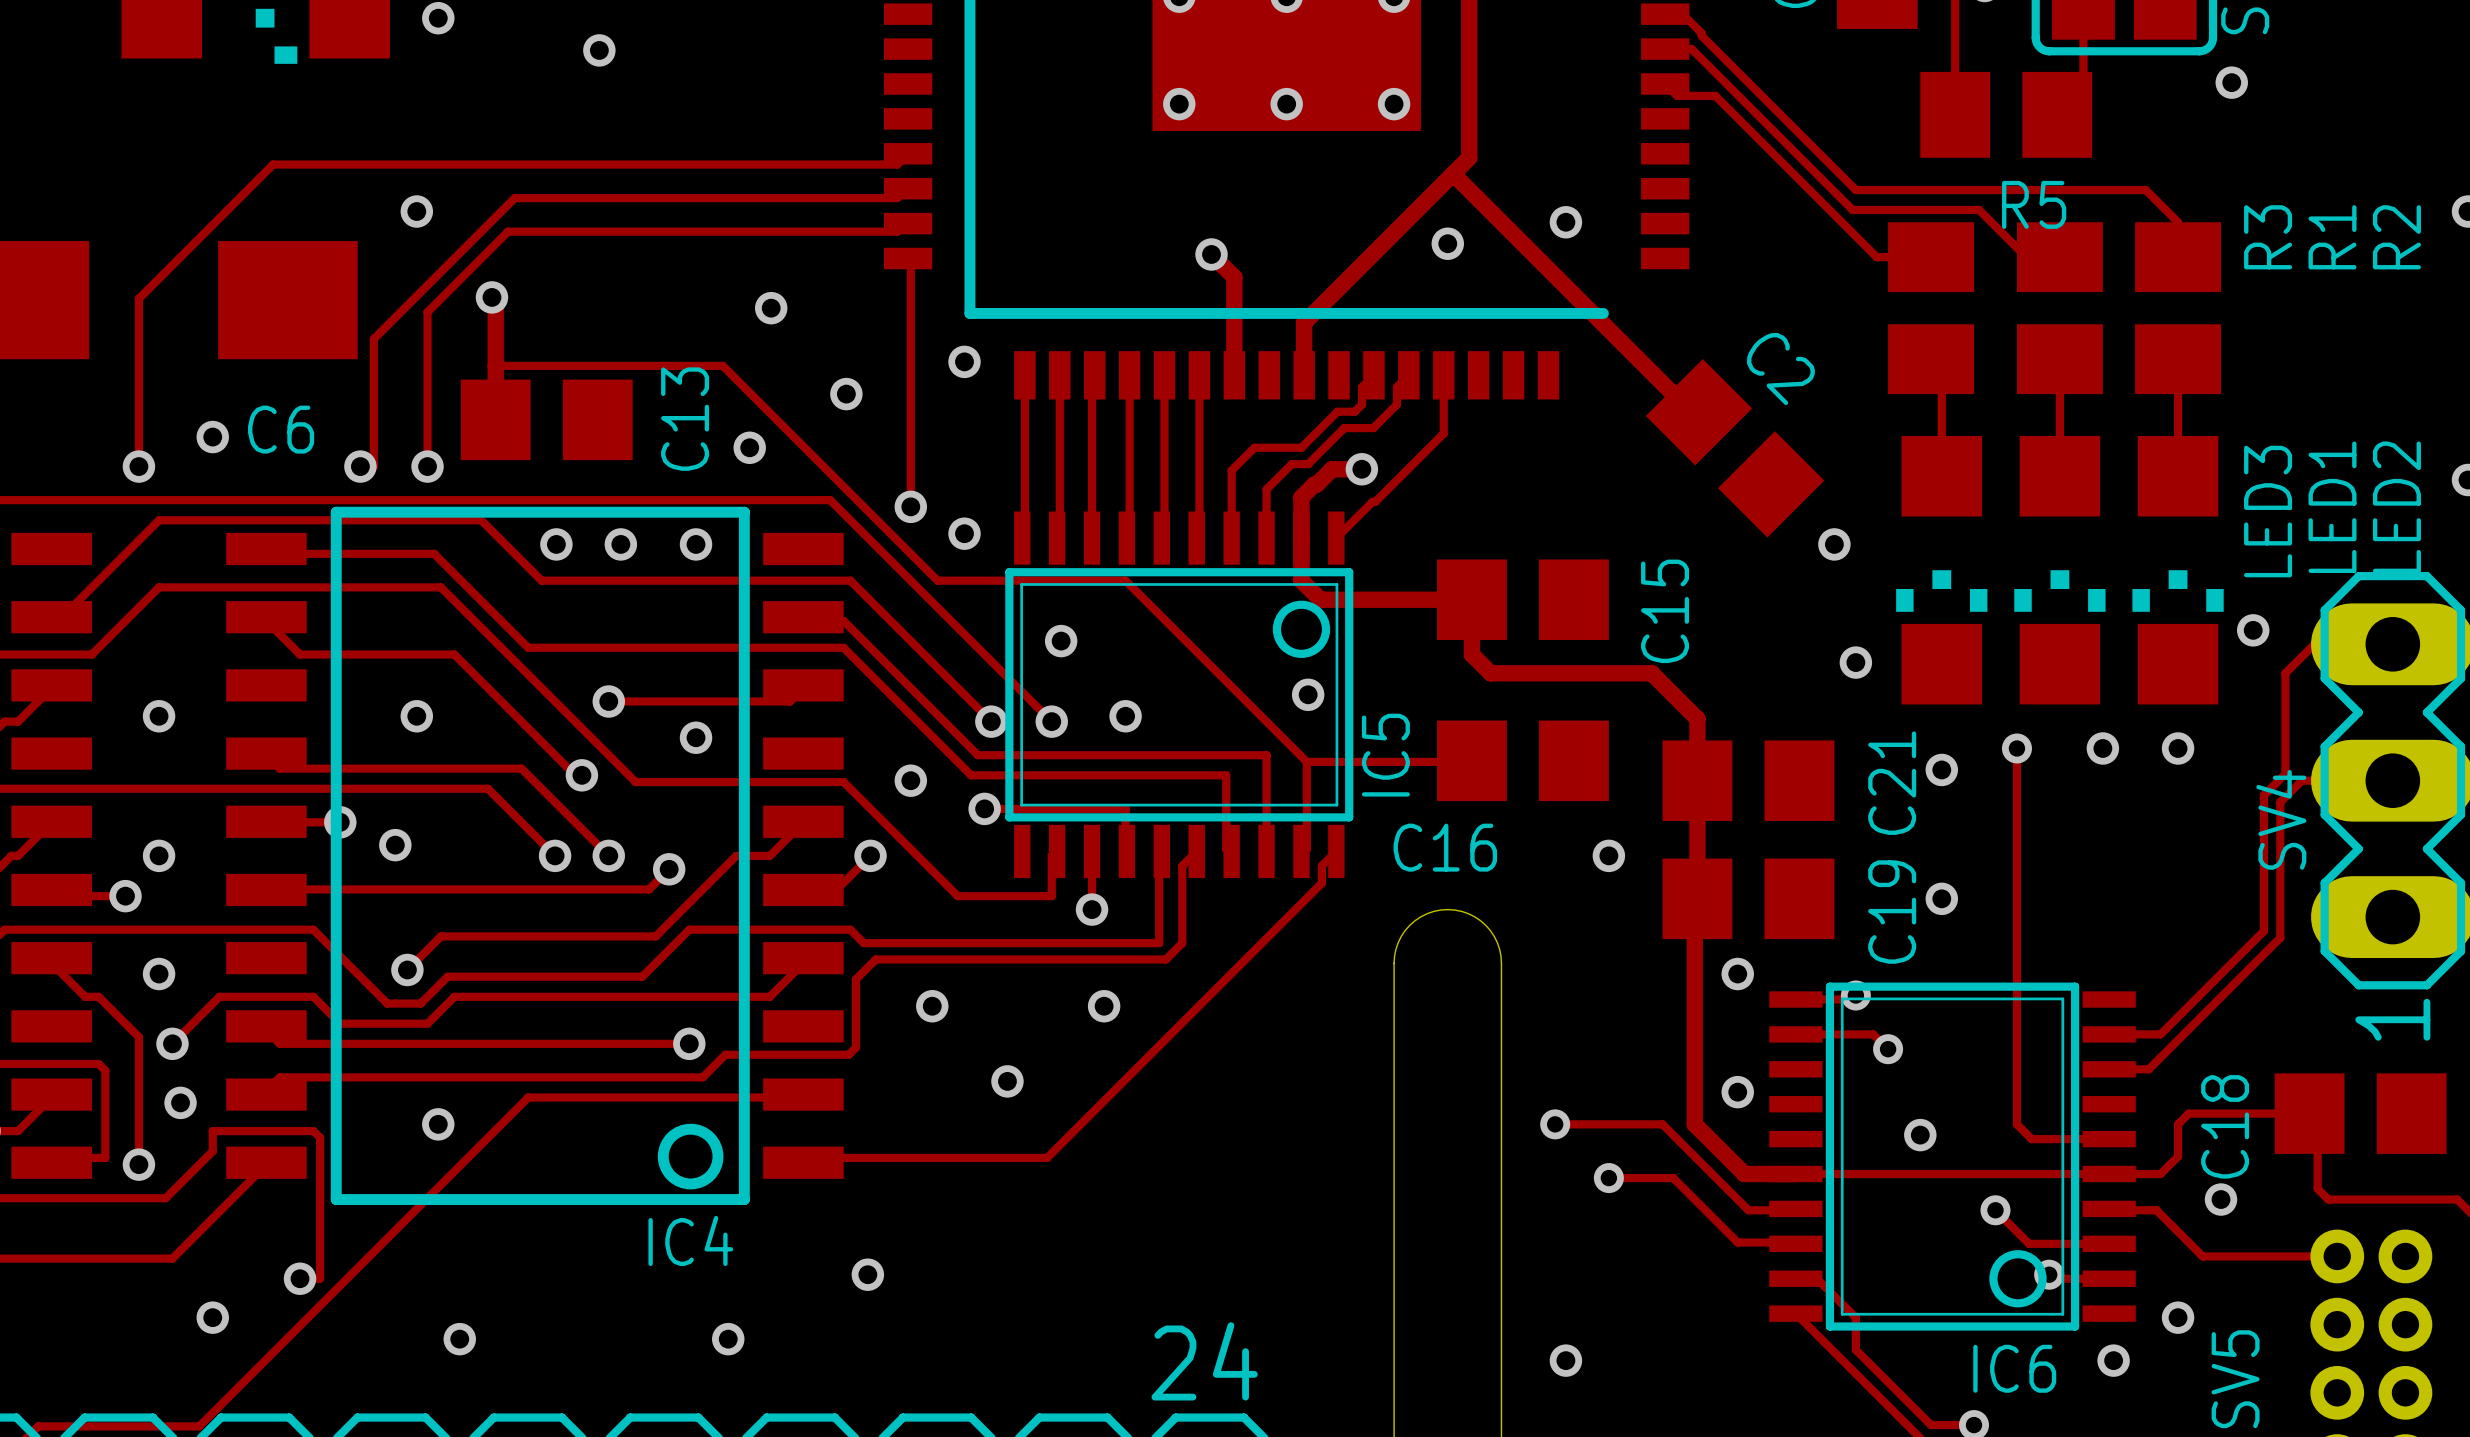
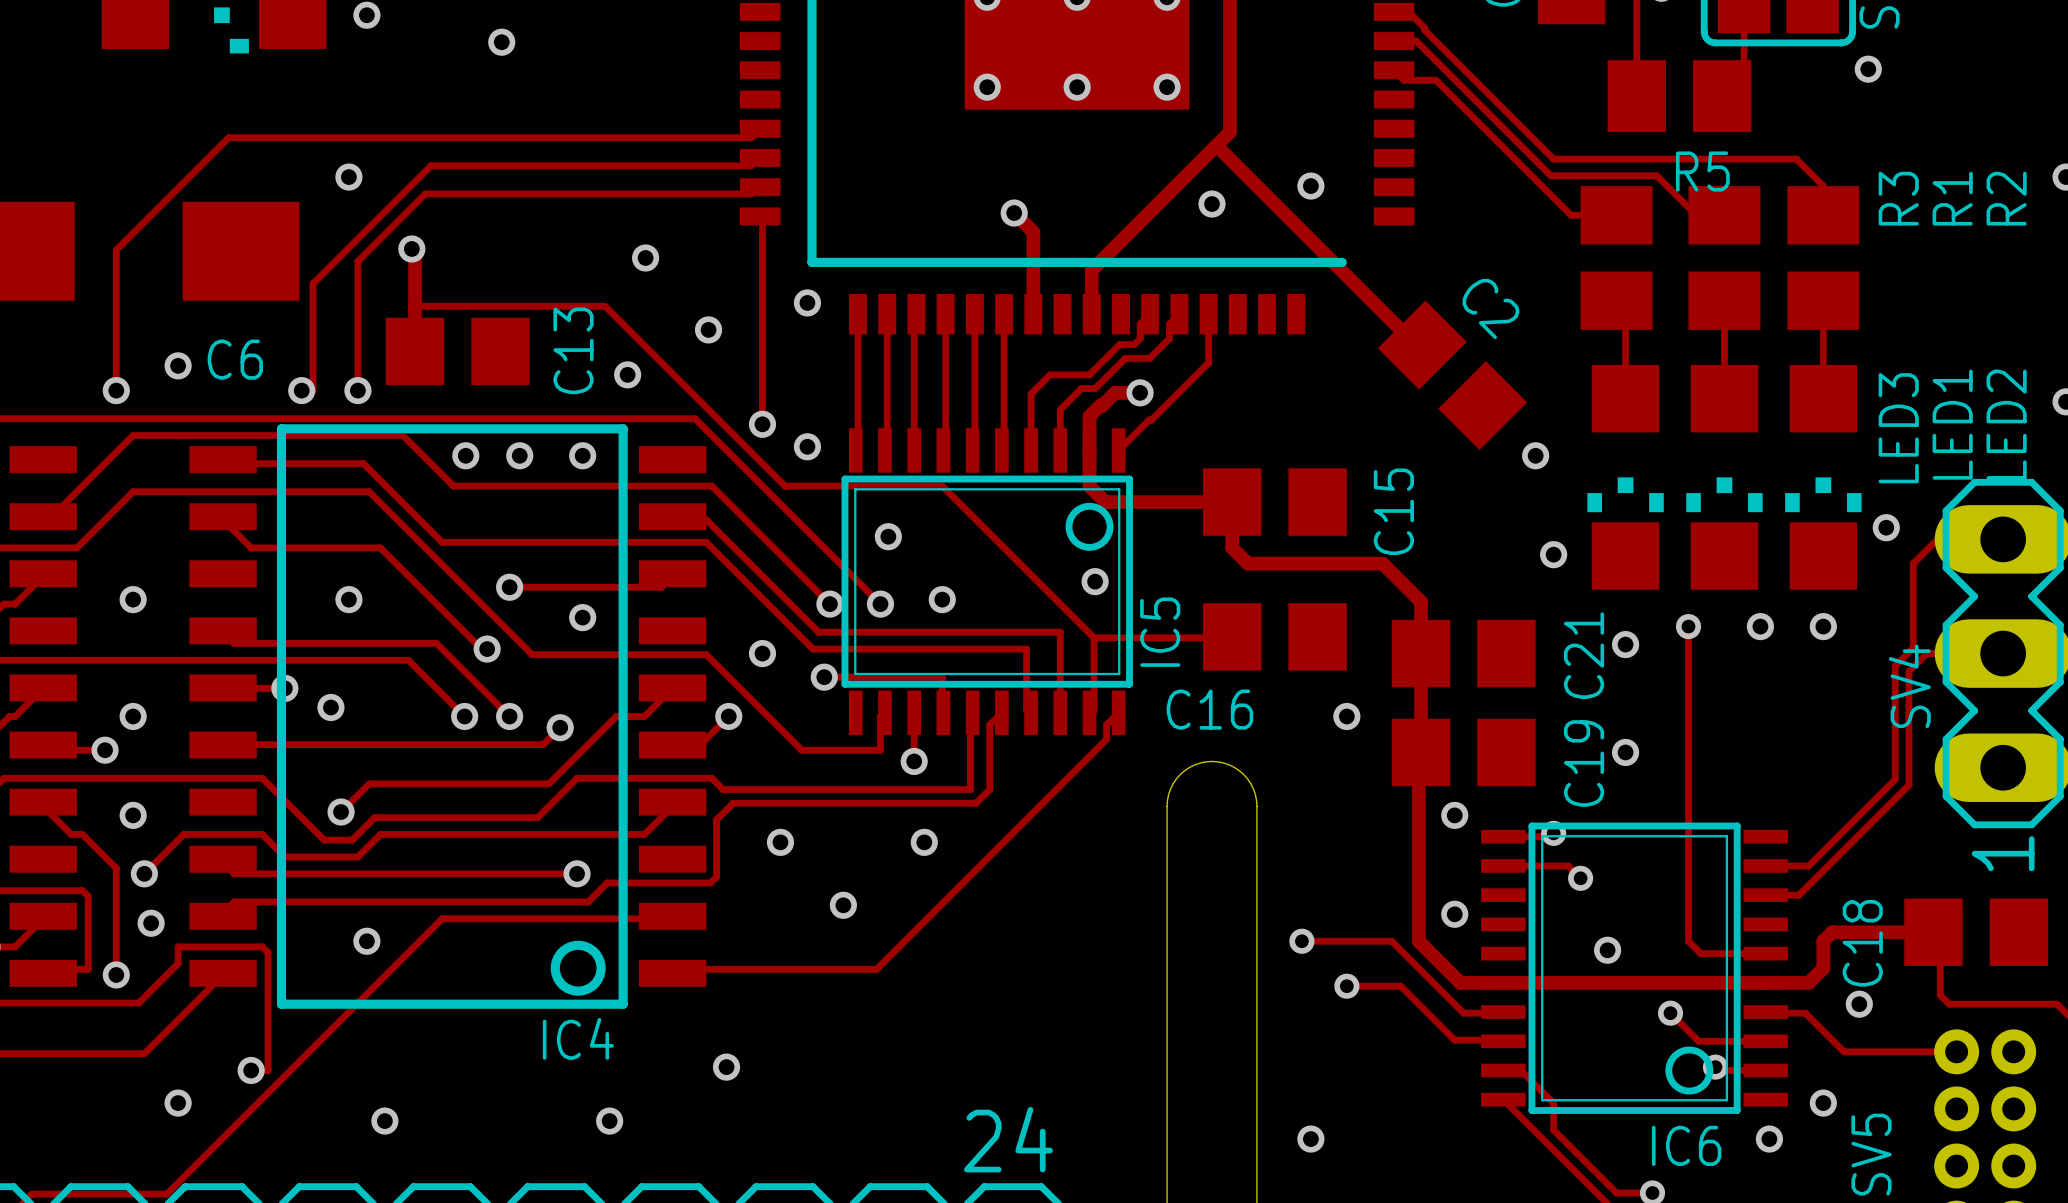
track width: thin (2309, 1113) (2188, 1113) (2178, 1124) (2178, 1156) (2160, 1174) (1795, 1174) -> thick (1933, 932) (1832, 932) (1823, 941) (1823, 968) (1808, 982) (1503, 982)

